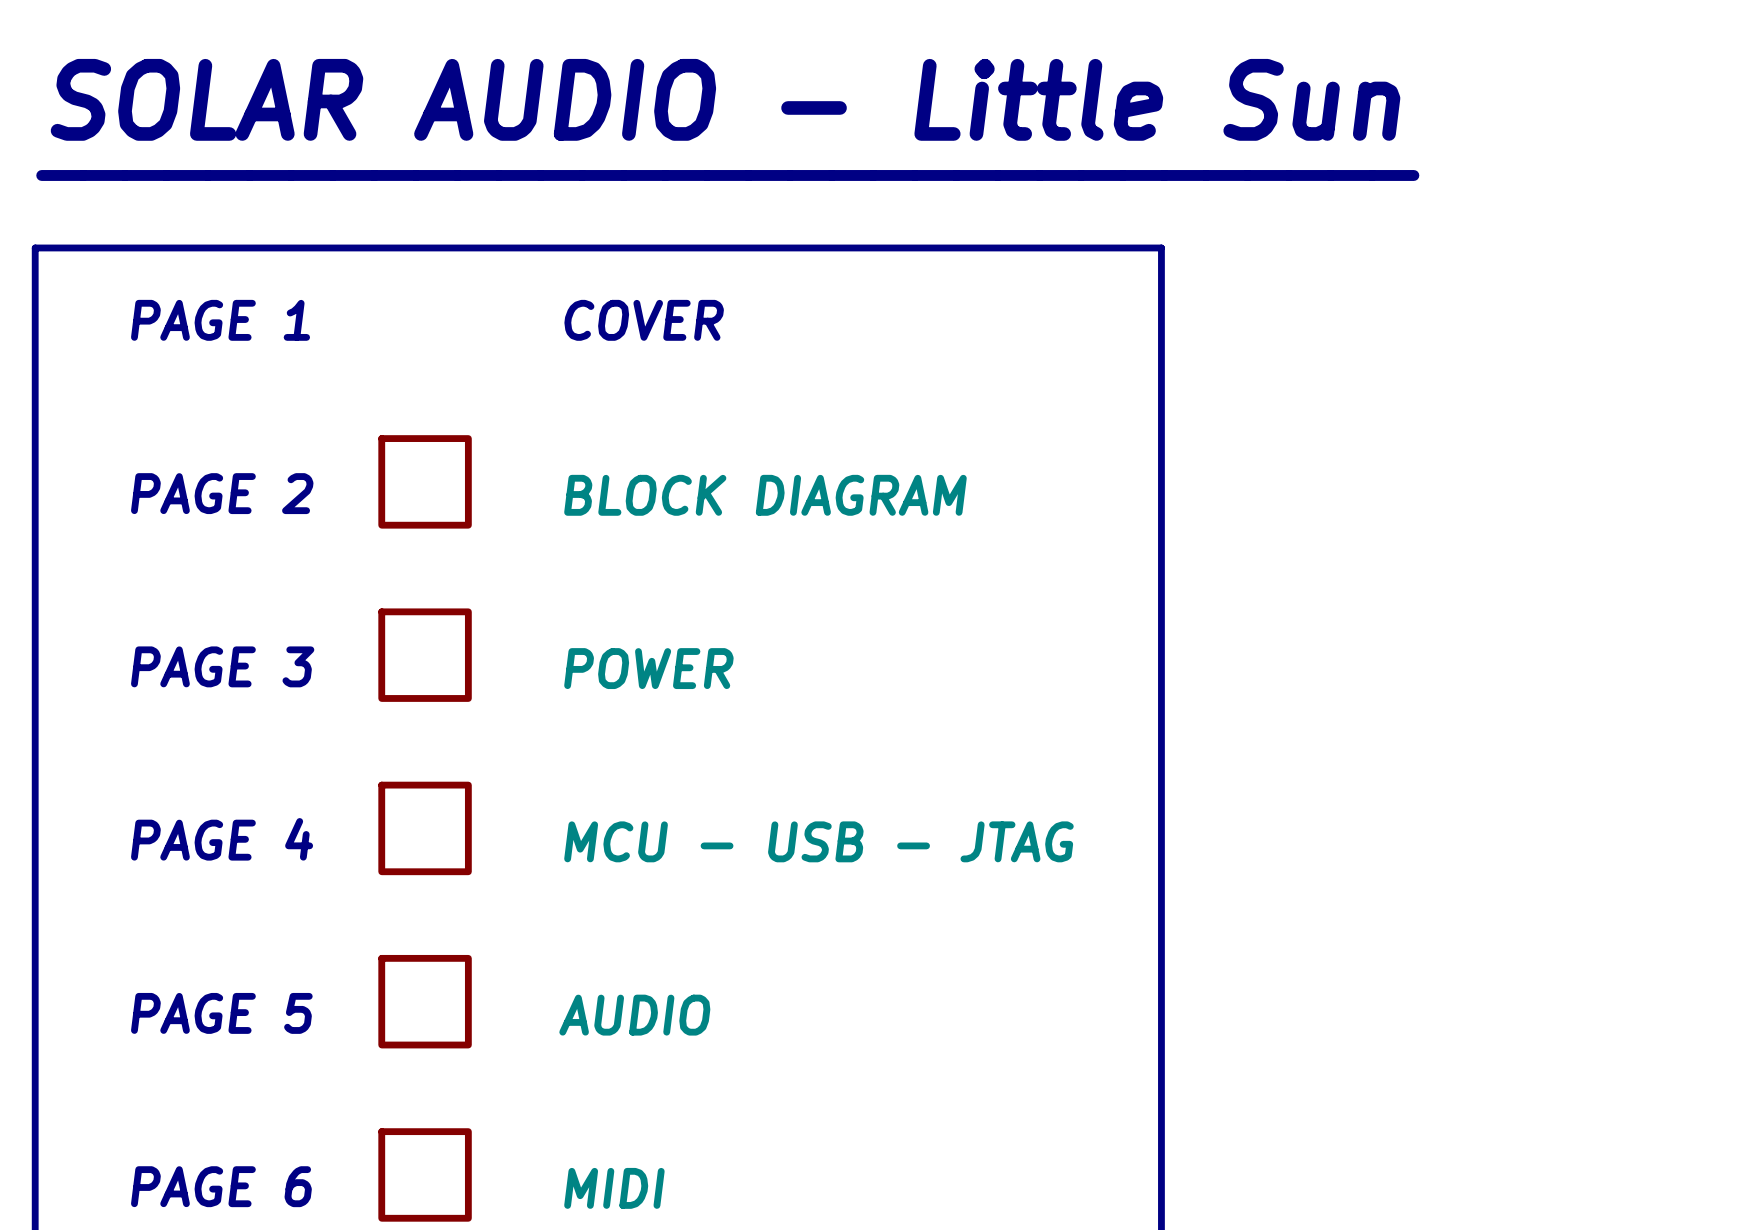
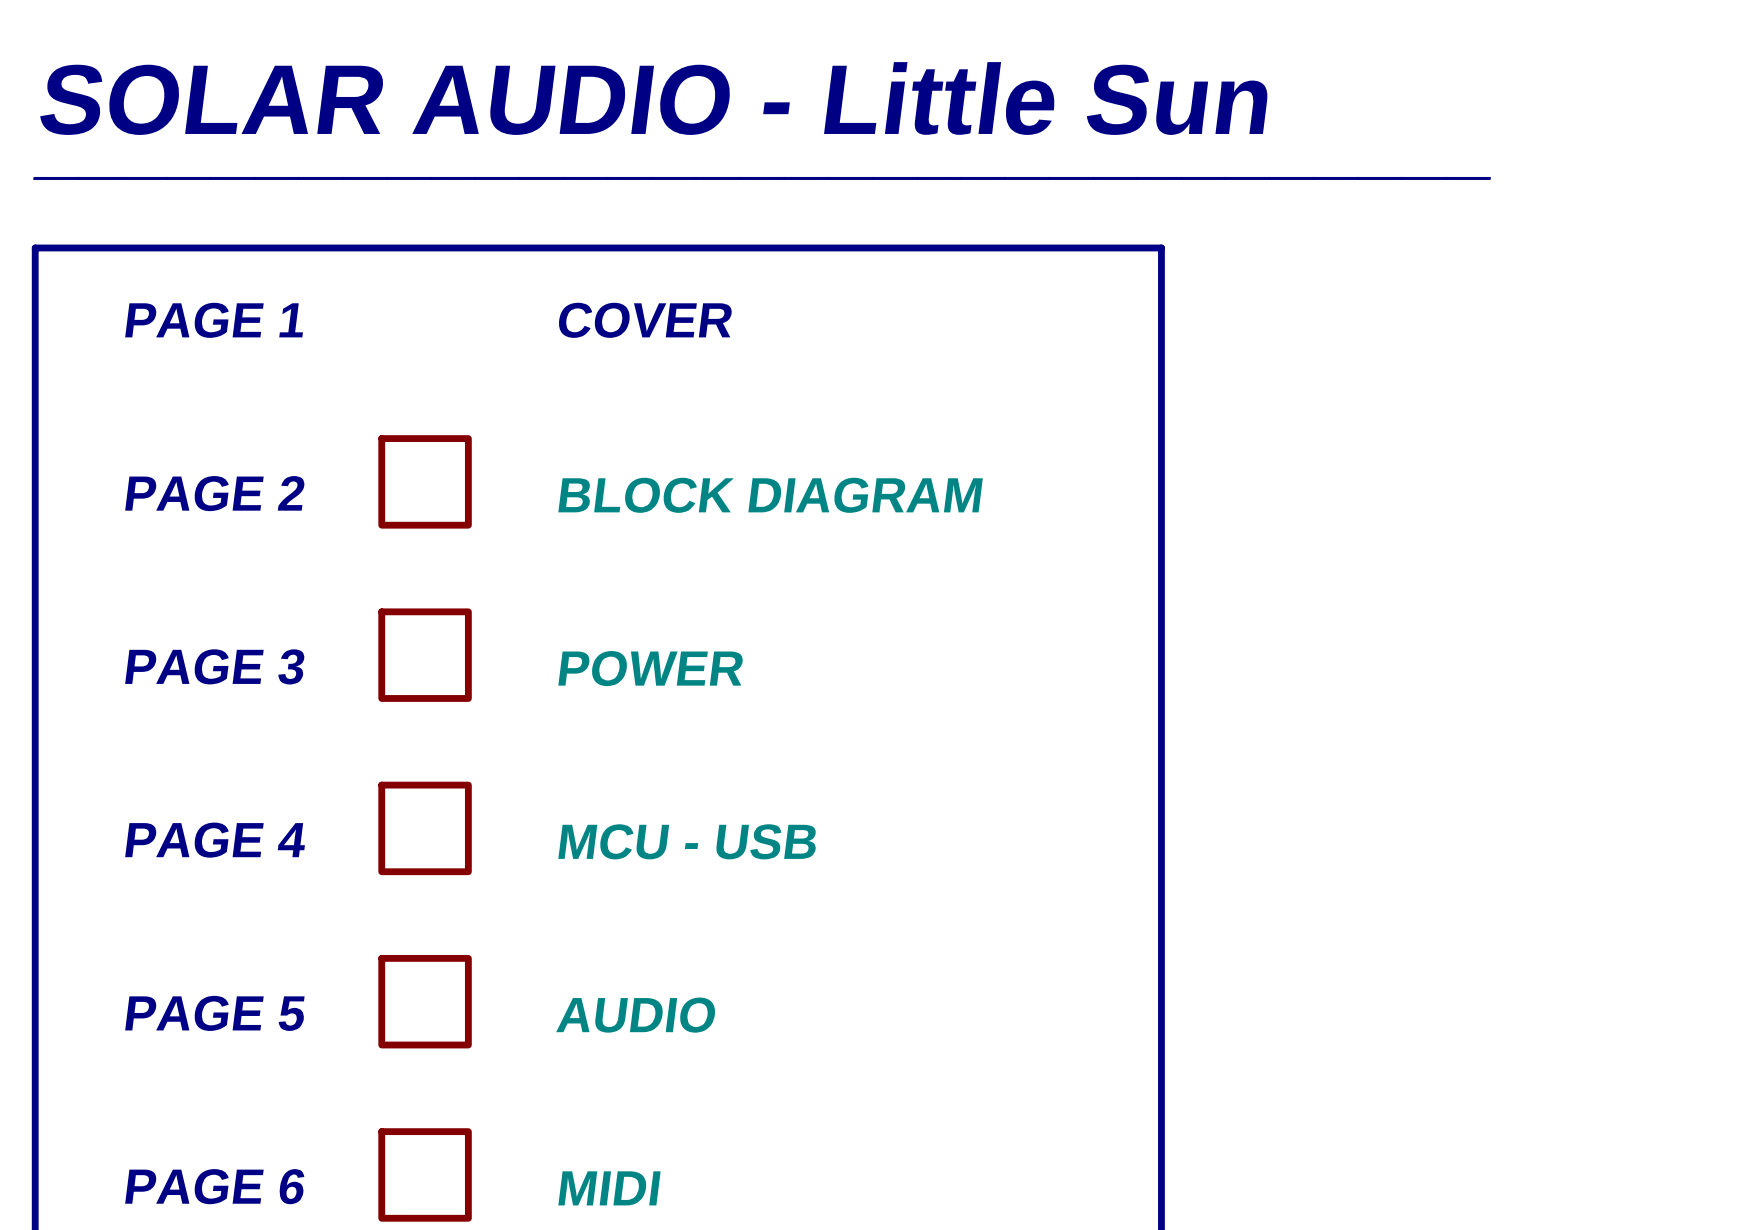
sheet MCU - USB - JTAG name: MCU - USB - JTAG (818, 841) -> MCU - USB (687, 841)

